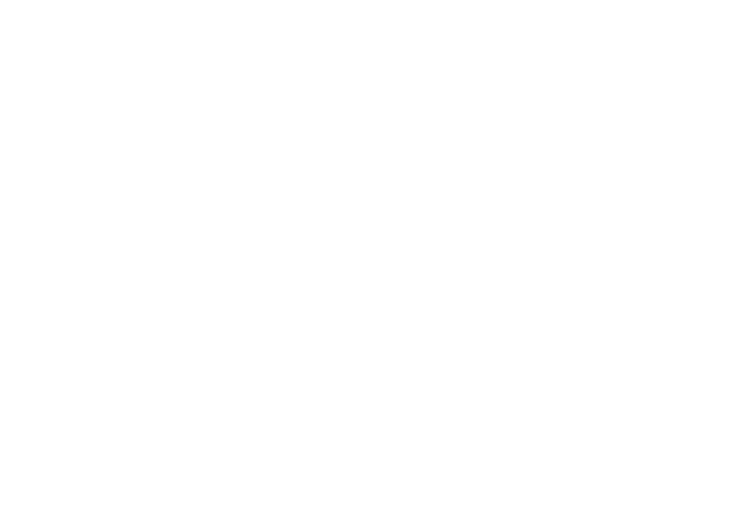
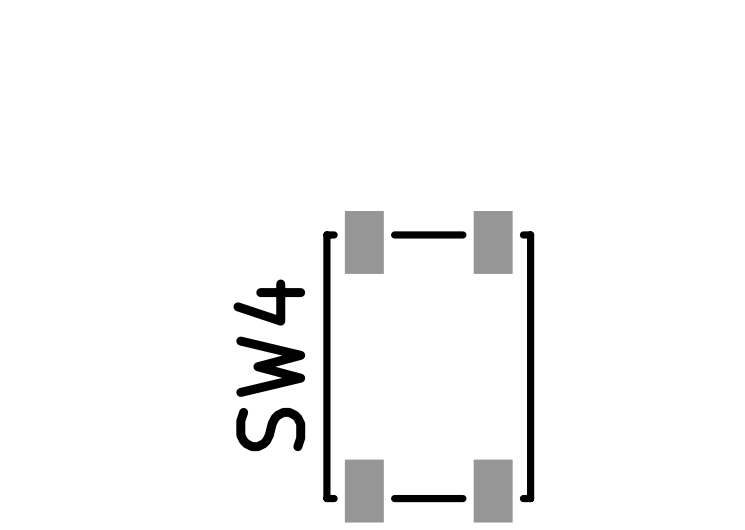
SW4: none -> (428, 366)

